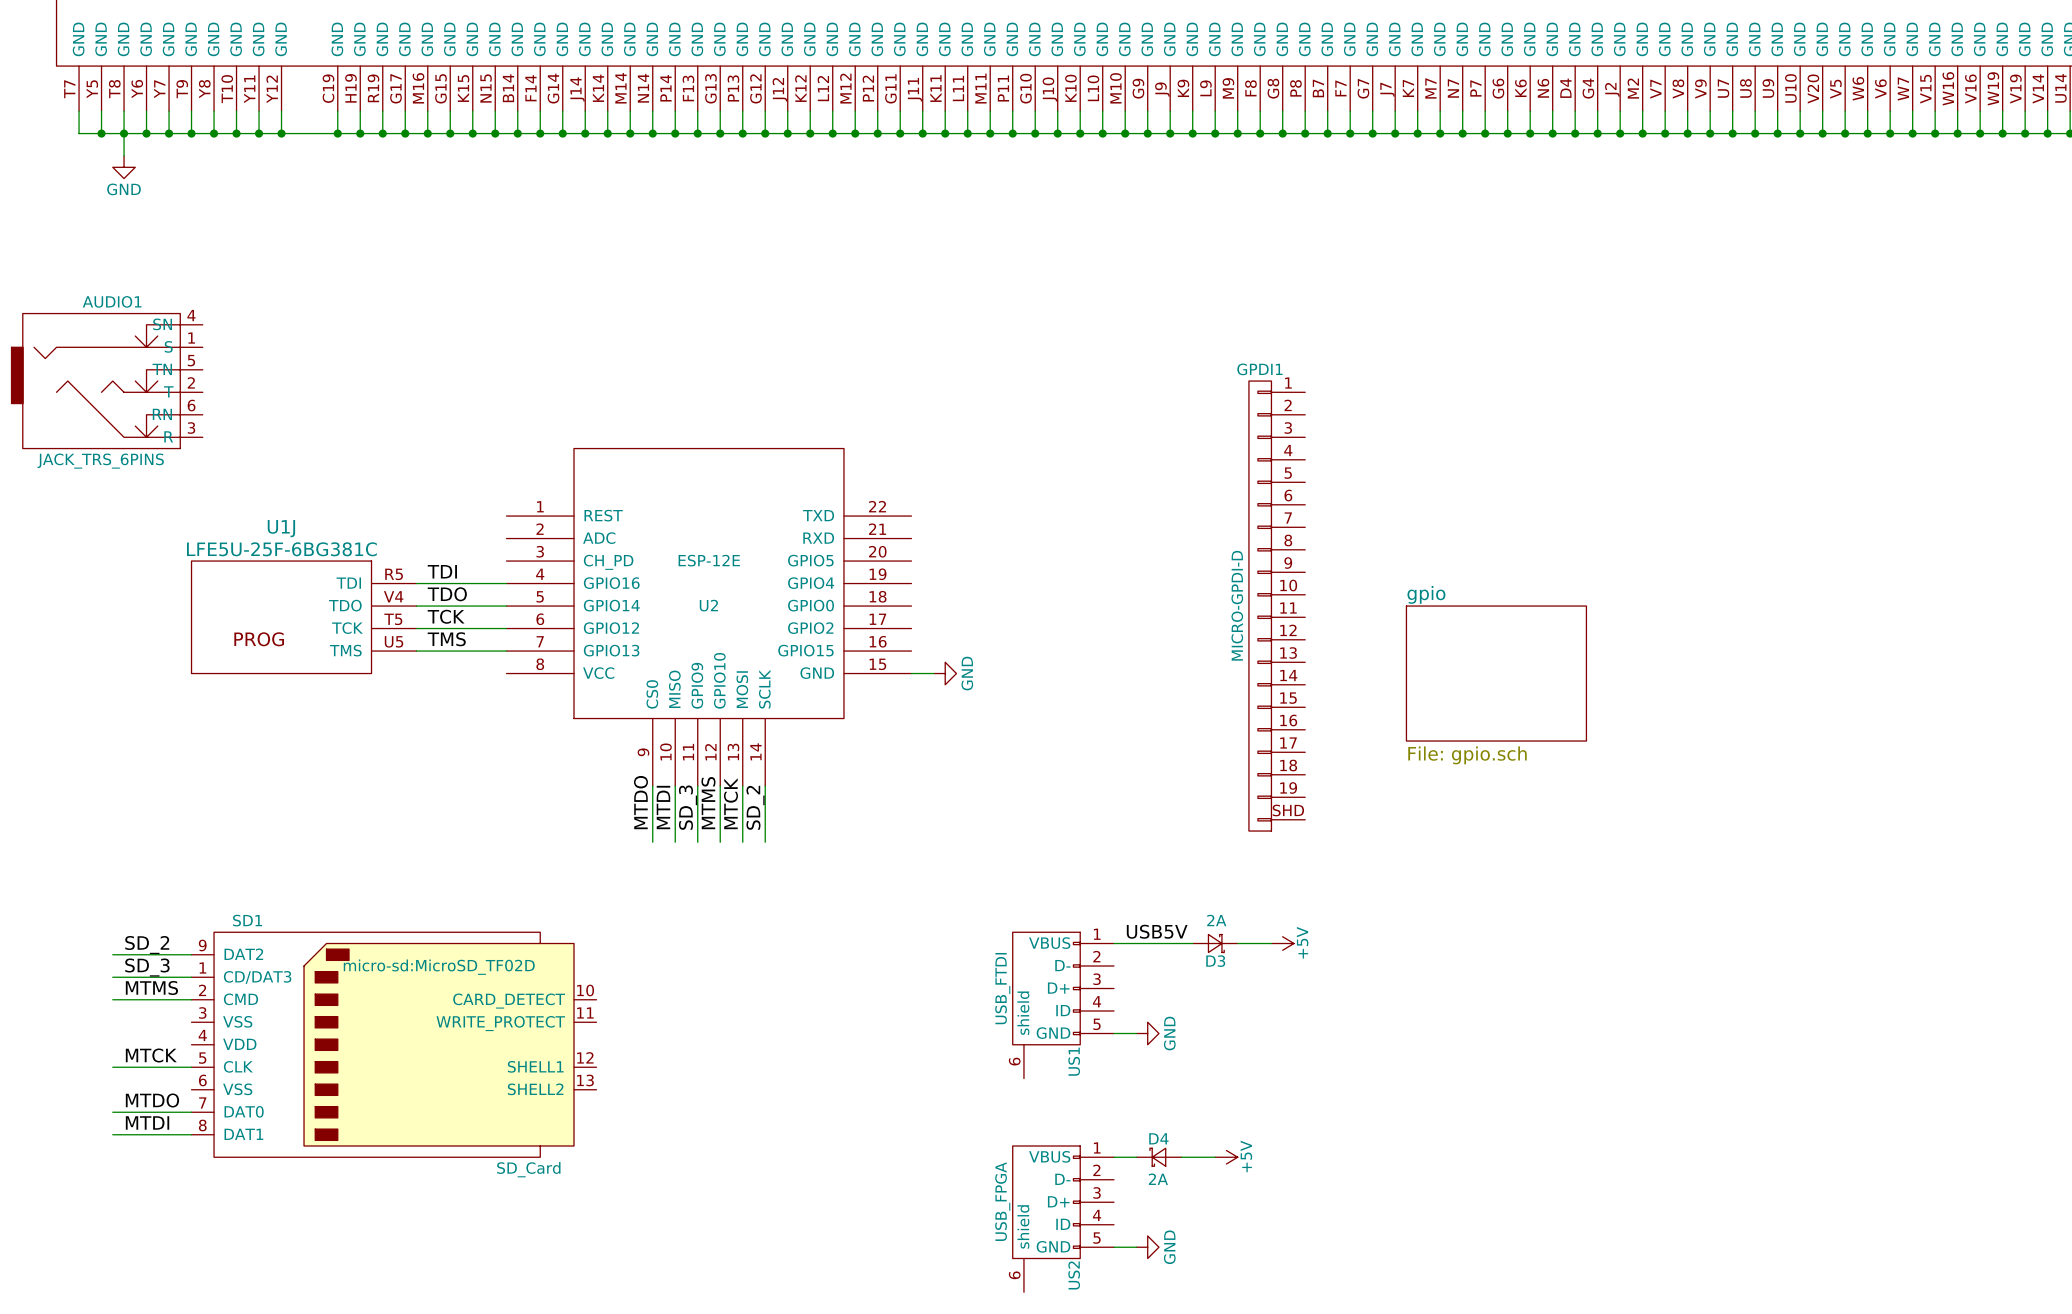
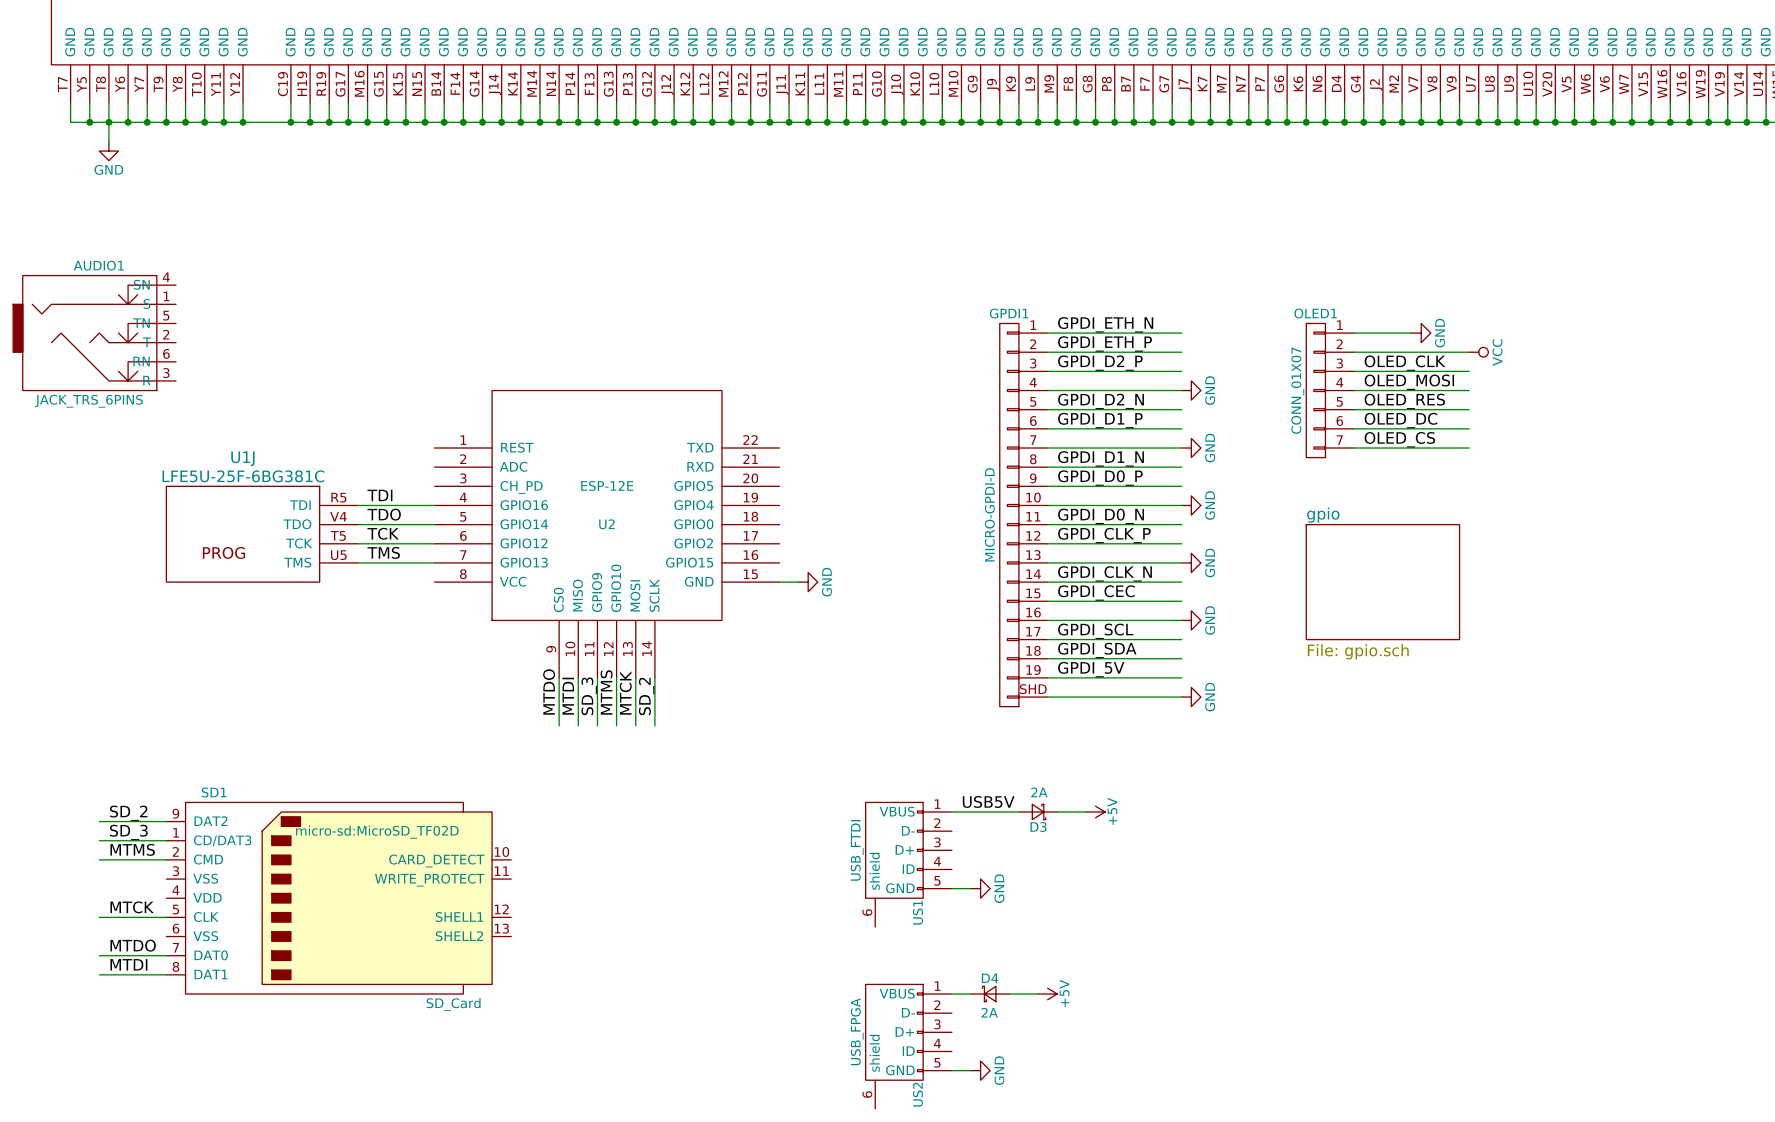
label: none -> GPDI_ETH_N (1105, 324)
wire: none -> (1047, 333) (1181, 333)
wire: none -> (1354, 333) (1411, 333)
power symbol: none -> GND (1421, 333)
label: none -> GPDI_ETH_P (1105, 343)
wire: none -> (1047, 352) (1181, 352)
wire: none -> (1354, 352) (1469, 352)
power symbol: none -> VCC (1478, 352)
label: none -> GPDI_D2_P (1100, 363)
label: none -> OLED_CLK (1405, 363)
wire: none -> (1047, 371) (1181, 371)
wire: none -> (1354, 371) (1469, 371)
label: none -> OLED_MOSI (1409, 382)
wire: none -> (1047, 390) (1181, 390)
power symbol: none -> GND (1191, 390)
OLED1: none -> CONN_01X07 (1330, 390)
wire: none -> (1354, 390) (1469, 390)
label: none -> GPDI_D2_N (1101, 401)
label: none -> OLED_RES (1404, 401)
wire: none -> (1047, 409) (1181, 409)
wire: none -> (1354, 409) (1469, 409)
label: none -> GPDI_D1_P (1100, 420)
label: none -> OLED_DC (1400, 420)
wire: none -> (1047, 428) (1181, 428)
wire: none -> (1354, 428) (1469, 428)
label: none -> OLED_CS (1399, 439)
wire: none -> (1047, 448) (1181, 448)
power symbol: none -> GND (1191, 448)
wire: none -> (1354, 448) (1469, 448)
label: none -> GPDI_D1_N (1101, 458)
wire: none -> (1047, 467) (1181, 467)
label: none -> GPDI_D0_P (1100, 478)
wire: none -> (1047, 486) (1181, 486)
wire: none -> (1047, 505) (1181, 505)
power symbol: none -> GND (1191, 505)
label: none -> GPDI_D0_N (1101, 516)
wire: none -> (1047, 524) (1181, 524)
GPDI1 position: (1277, 606) -> (1023, 515)
label: none -> GPDI_CLK_P (1104, 535)
wire: none -> (1047, 543) (1181, 543)
wire: none -> (1047, 562) (1181, 562)
power symbol: none -> GND (1191, 562)
label: none -> GPDI_CLK_N (1105, 573)
wire: none -> (1047, 582) (1181, 582)
sheet gpio position: (1496, 673) -> (1382, 582)
label: none -> GPDI_CEC (1096, 593)
wire: none -> (1047, 601) (1181, 601)
wire: none -> (1047, 620) (1181, 620)
power symbol: none -> GND (1191, 620)
label: none -> GPDI_SCL (1095, 631)
wire: none -> (1047, 639) (1181, 639)
label: none -> GPDI_SDA (1097, 650)
wire: none -> (1047, 658) (1181, 658)
label: none -> GPDI_5V (1091, 669)
wire: none -> (1047, 677) (1181, 677)
wire: none -> (1047, 697) (1181, 697)
power symbol: none -> GND (1191, 697)

